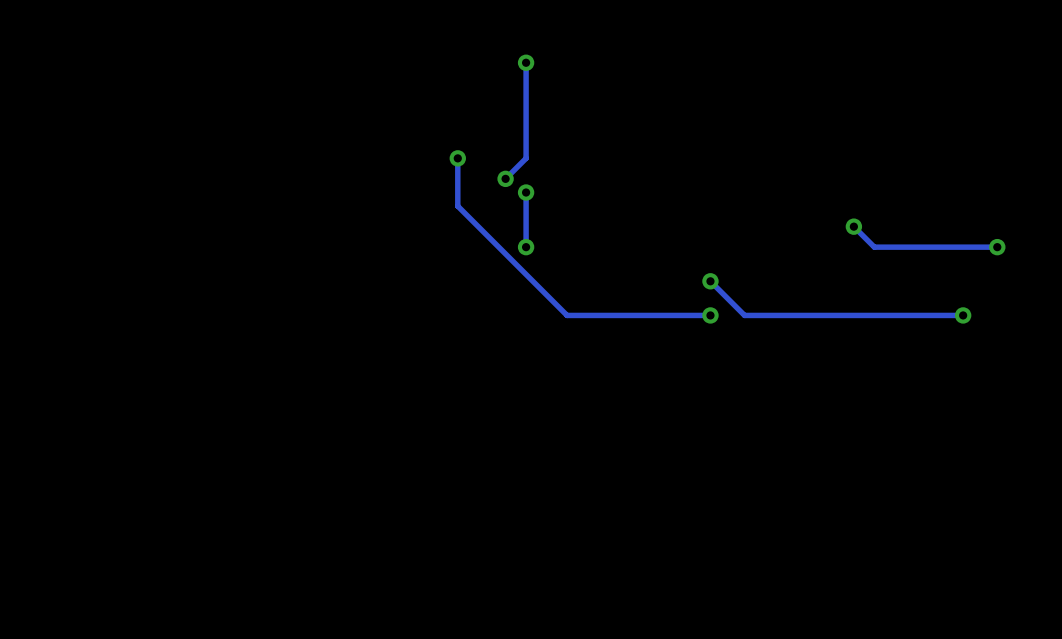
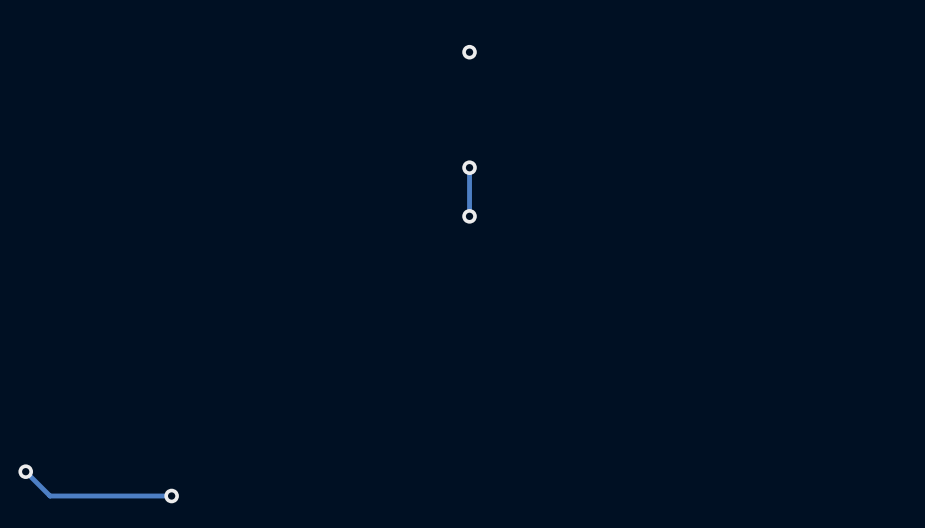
track: (526, 62) (526, 158) (505, 178) -> none
track: (457, 158) (457, 206) (567, 315) (710, 315) -> none
via: (457, 158) -> none
via: (505, 178) -> none
track: (853, 226) (874, 247) (997, 247) -> none
via: (853, 226) -> none
via: (997, 247) -> none
track: (710, 281) (744, 315) (963, 315) -> none
via: (710, 281) -> none
via: (710, 315) -> none
via: (963, 315) -> none
track: none -> (25, 471) (50, 496) (171, 496)
via: none -> (25, 471)
via: none -> (171, 496)

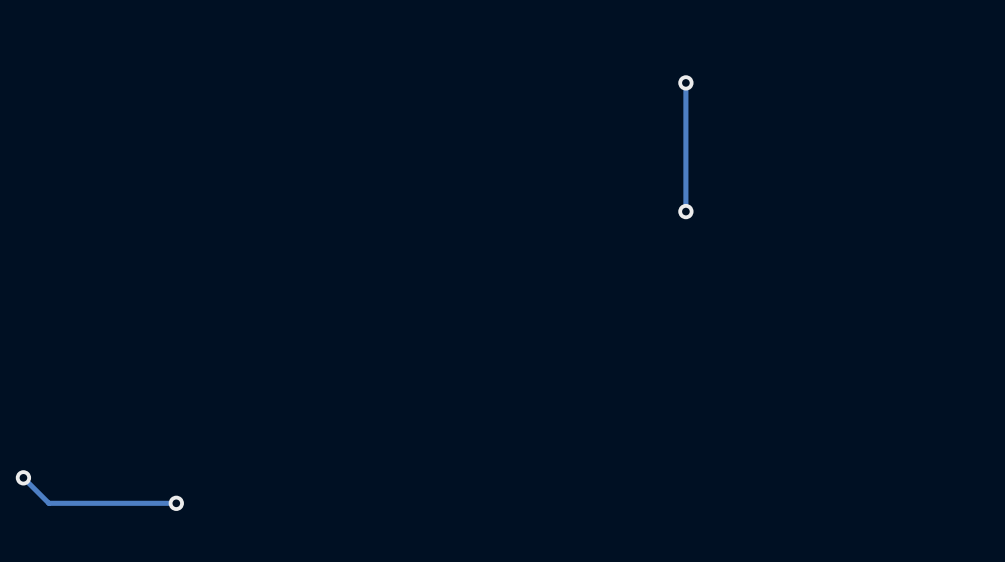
via: (469, 52) -> none
track: none -> (685, 82) (685, 211)
via: none -> (685, 82)
track: (469, 167) (469, 216) -> none
via: (469, 167) -> none
via: (469, 216) -> none
via: none -> (685, 211)

